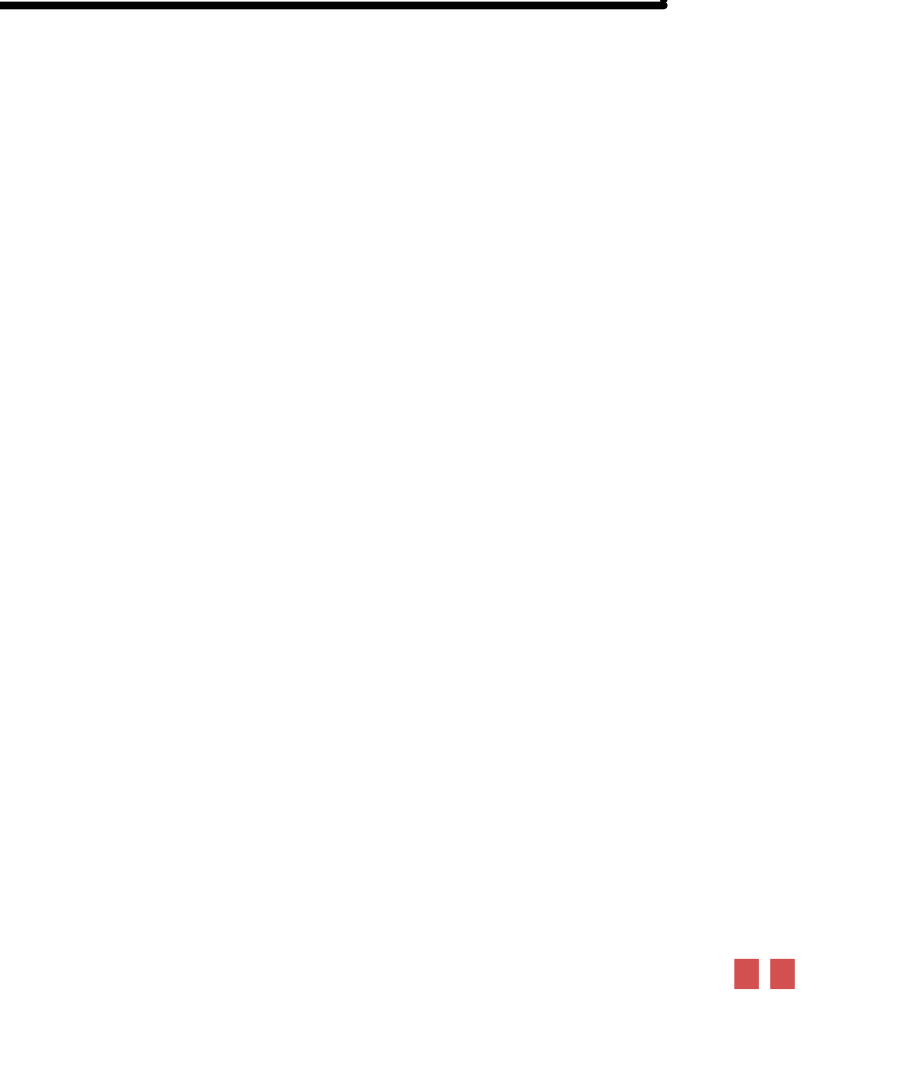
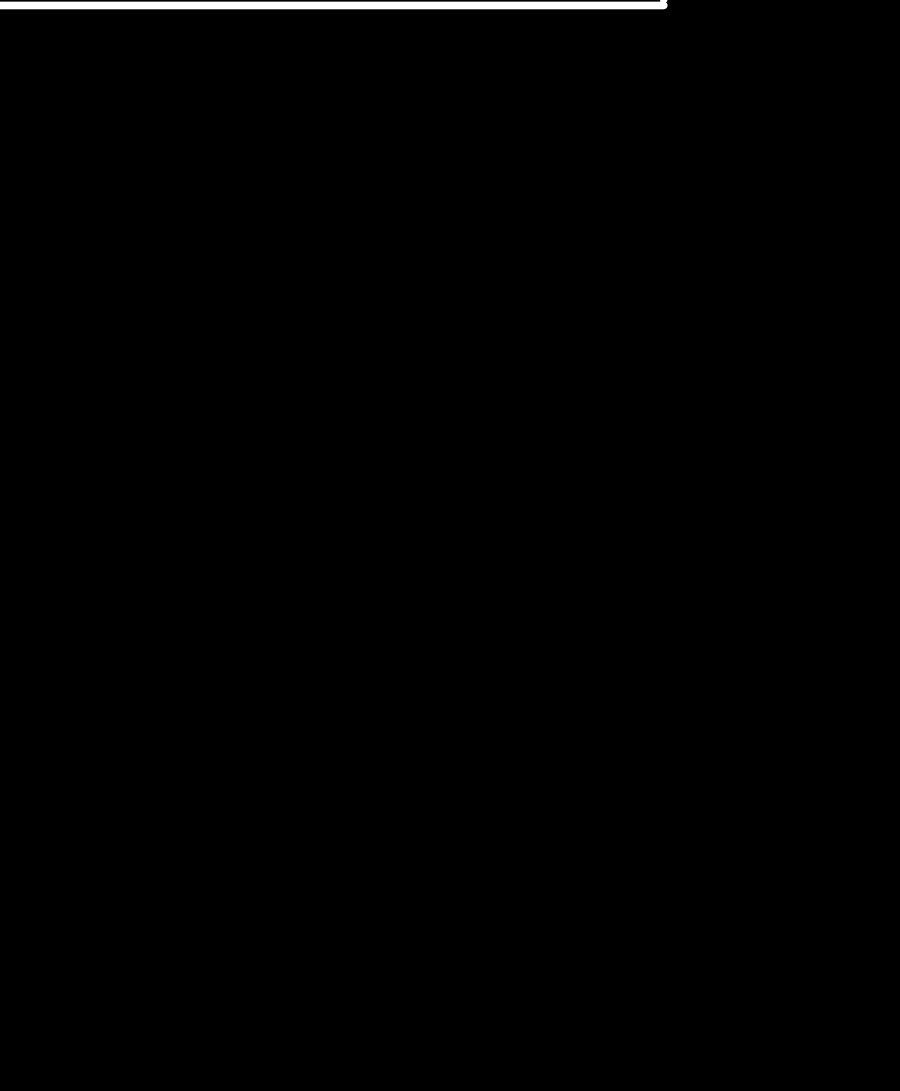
part: (764, 973) -> none

